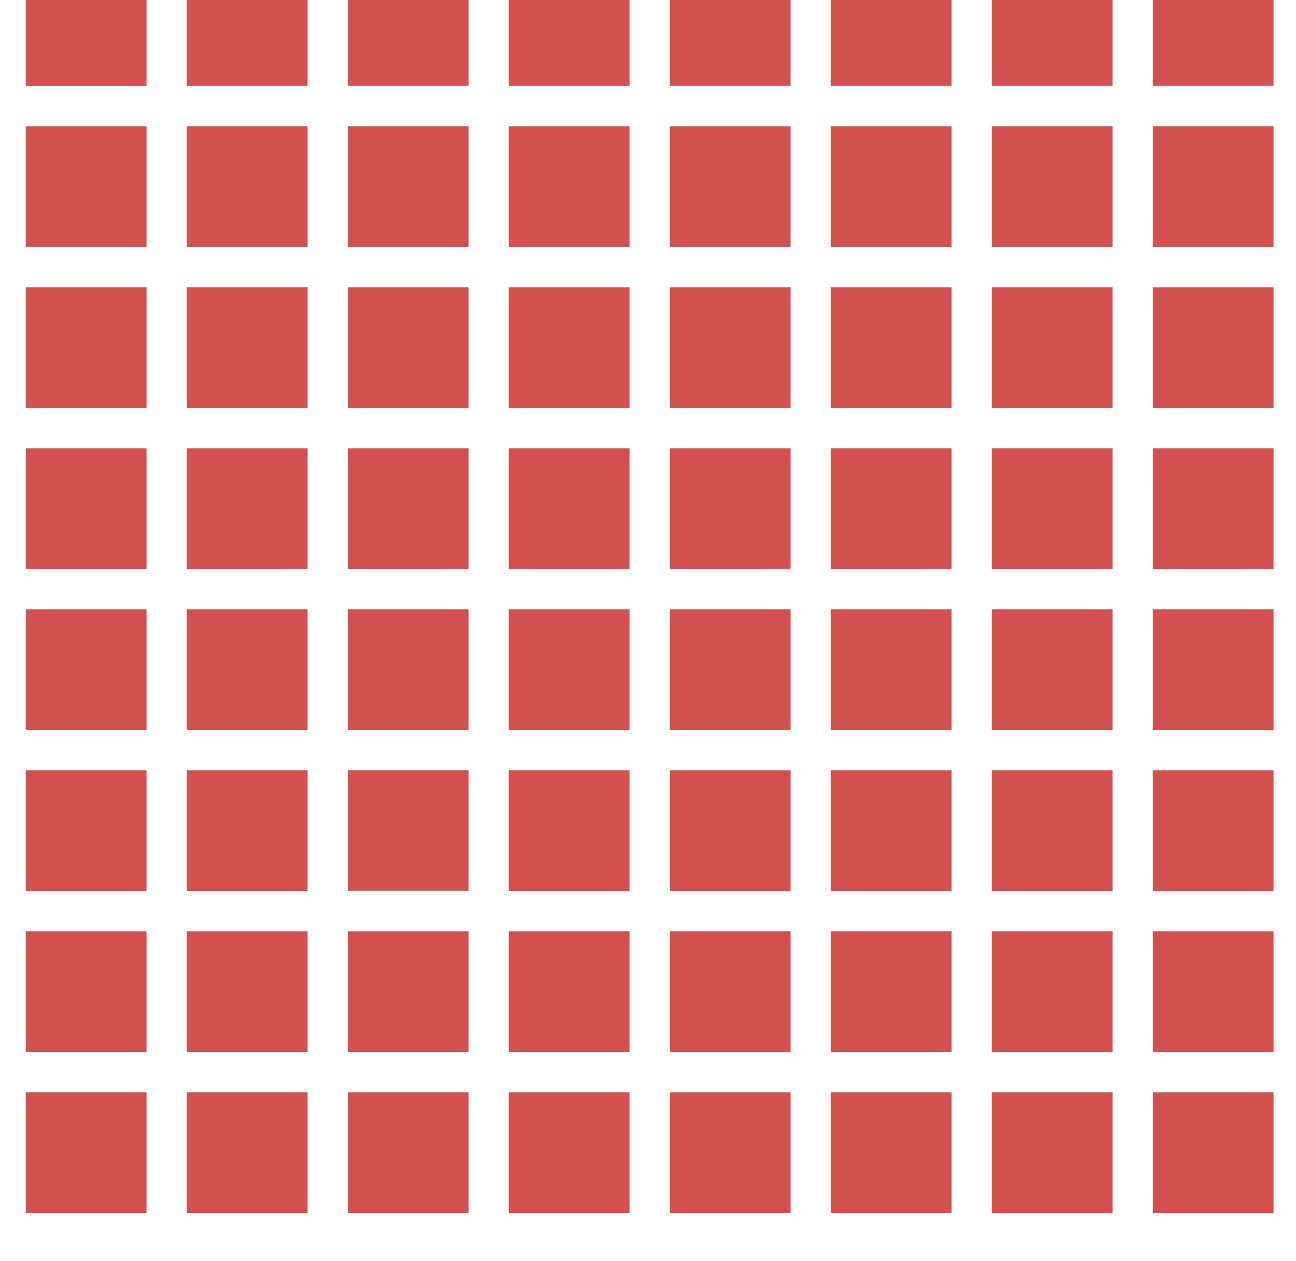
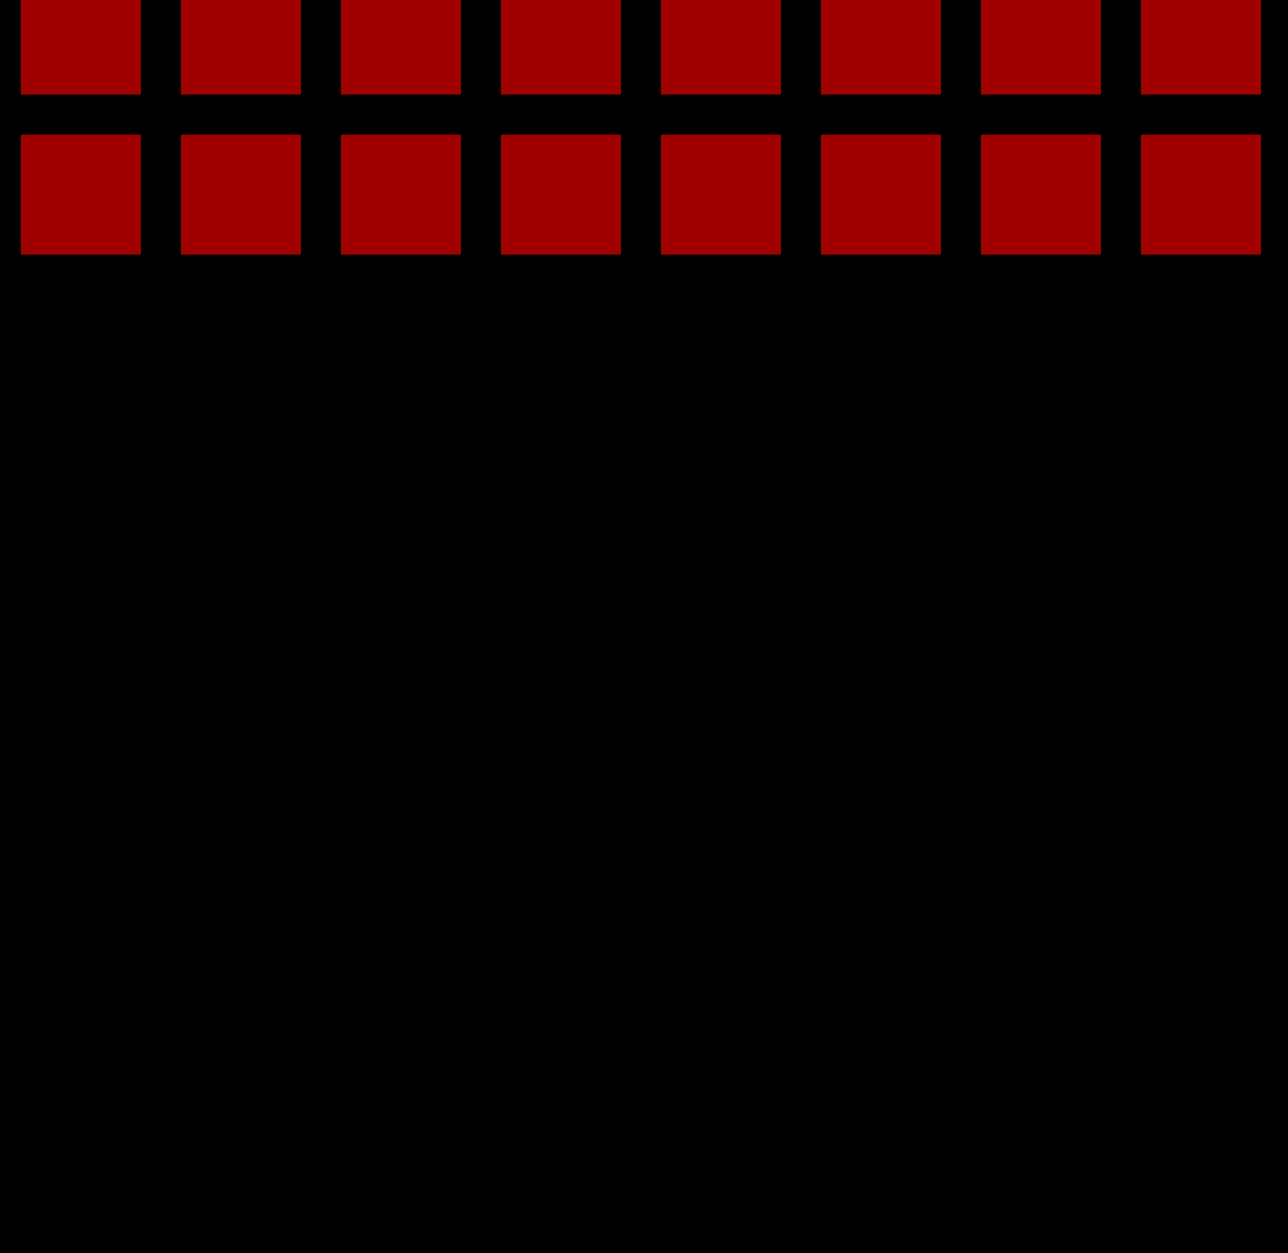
drawing: [25, 287, 147, 408] -> none
drawing: [186, 287, 308, 408] -> none
drawing: [347, 287, 469, 408] -> none
drawing: [508, 287, 630, 408] -> none
drawing: [669, 287, 791, 408] -> none
drawing: [830, 287, 952, 408] -> none
drawing: [991, 287, 1113, 408] -> none
drawing: [1152, 287, 1274, 408] -> none
drawing: [25, 448, 147, 569] -> none
drawing: [186, 448, 308, 569] -> none
drawing: [347, 448, 469, 569] -> none
drawing: [508, 448, 630, 569] -> none
drawing: [669, 448, 791, 569] -> none
drawing: [830, 448, 952, 569] -> none
drawing: [991, 448, 1113, 569] -> none
drawing: [1152, 448, 1274, 569] -> none
drawing: [25, 609, 147, 730] -> none
drawing: [186, 609, 308, 730] -> none
drawing: [347, 609, 469, 730] -> none
drawing: [508, 609, 630, 730] -> none
drawing: [669, 609, 791, 730] -> none
drawing: [830, 609, 952, 730] -> none
drawing: [991, 609, 1113, 730] -> none
drawing: [1152, 609, 1274, 730] -> none
drawing: [25, 770, 147, 891] -> none
drawing: [186, 770, 308, 891] -> none
drawing: [347, 770, 469, 891] -> none
drawing: [508, 770, 630, 891] -> none
drawing: [669, 770, 791, 891] -> none
drawing: [830, 770, 952, 891] -> none
drawing: [991, 770, 1113, 891] -> none
drawing: [1152, 770, 1274, 891] -> none
drawing: [25, 931, 147, 1052] -> none
drawing: [186, 931, 308, 1052] -> none
drawing: [347, 931, 469, 1052] -> none
drawing: [508, 931, 630, 1052] -> none
drawing: [669, 931, 791, 1052] -> none
drawing: [830, 931, 952, 1052] -> none
drawing: [991, 931, 1113, 1052] -> none
drawing: [1152, 931, 1274, 1052] -> none
drawing: [25, 1092, 147, 1213] -> none
drawing: [186, 1092, 308, 1213] -> none
drawing: [347, 1092, 469, 1213] -> none
drawing: [508, 1092, 630, 1213] -> none
drawing: [669, 1092, 791, 1213] -> none
drawing: [830, 1092, 952, 1213] -> none
drawing: [991, 1092, 1113, 1213] -> none
drawing: [1152, 1092, 1274, 1213] -> none

